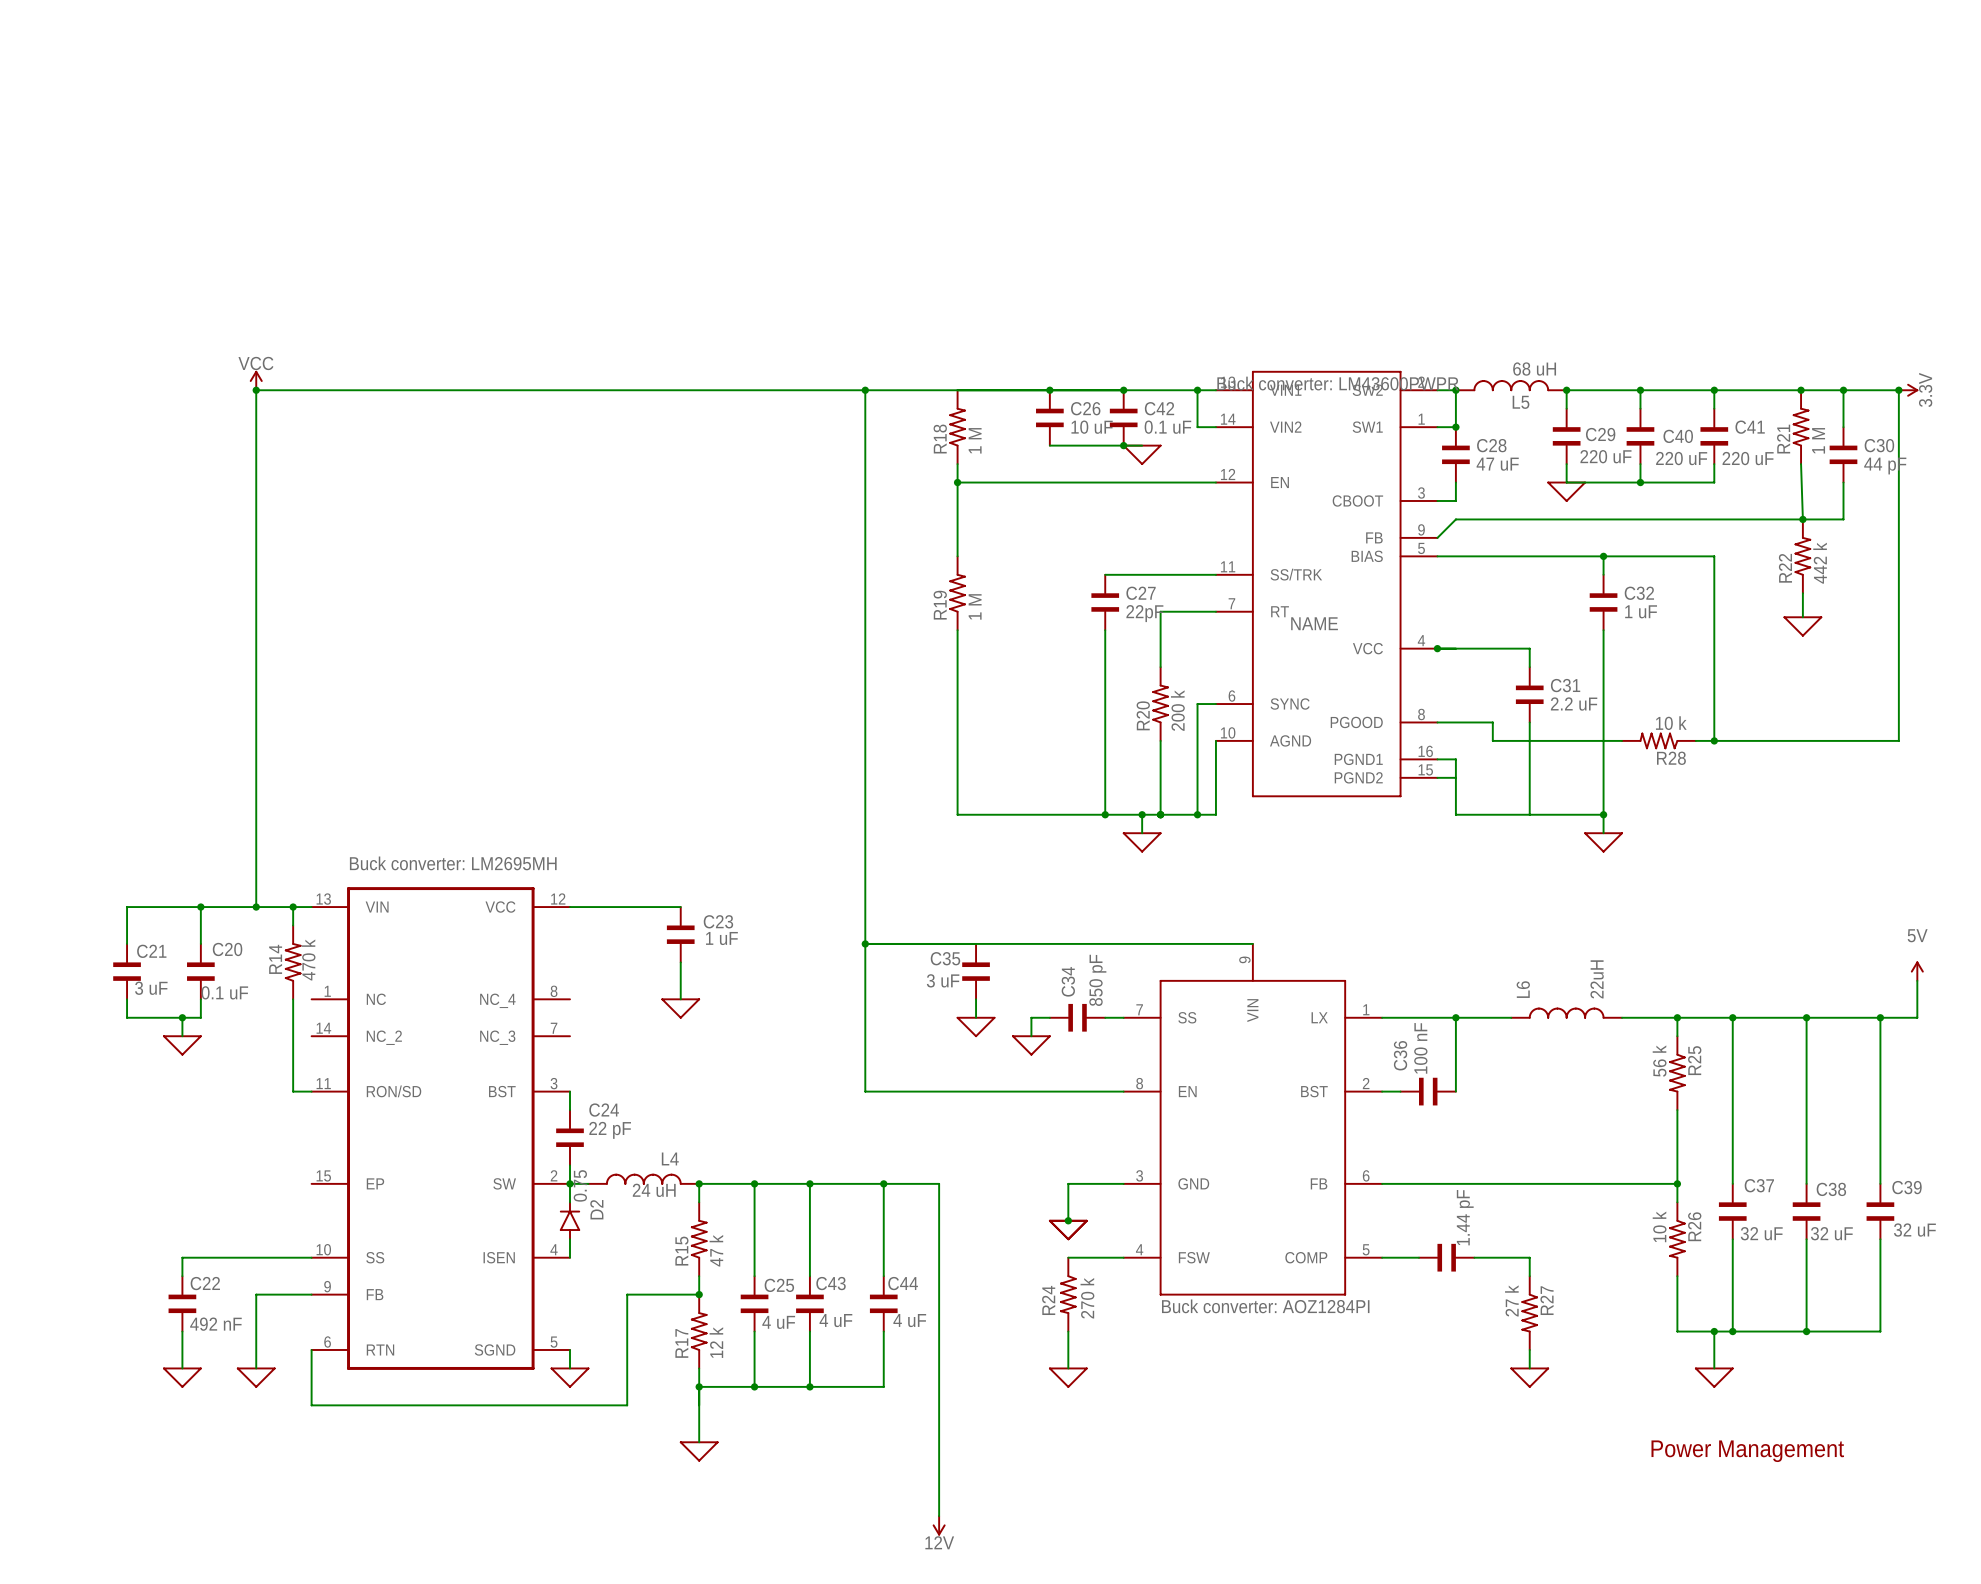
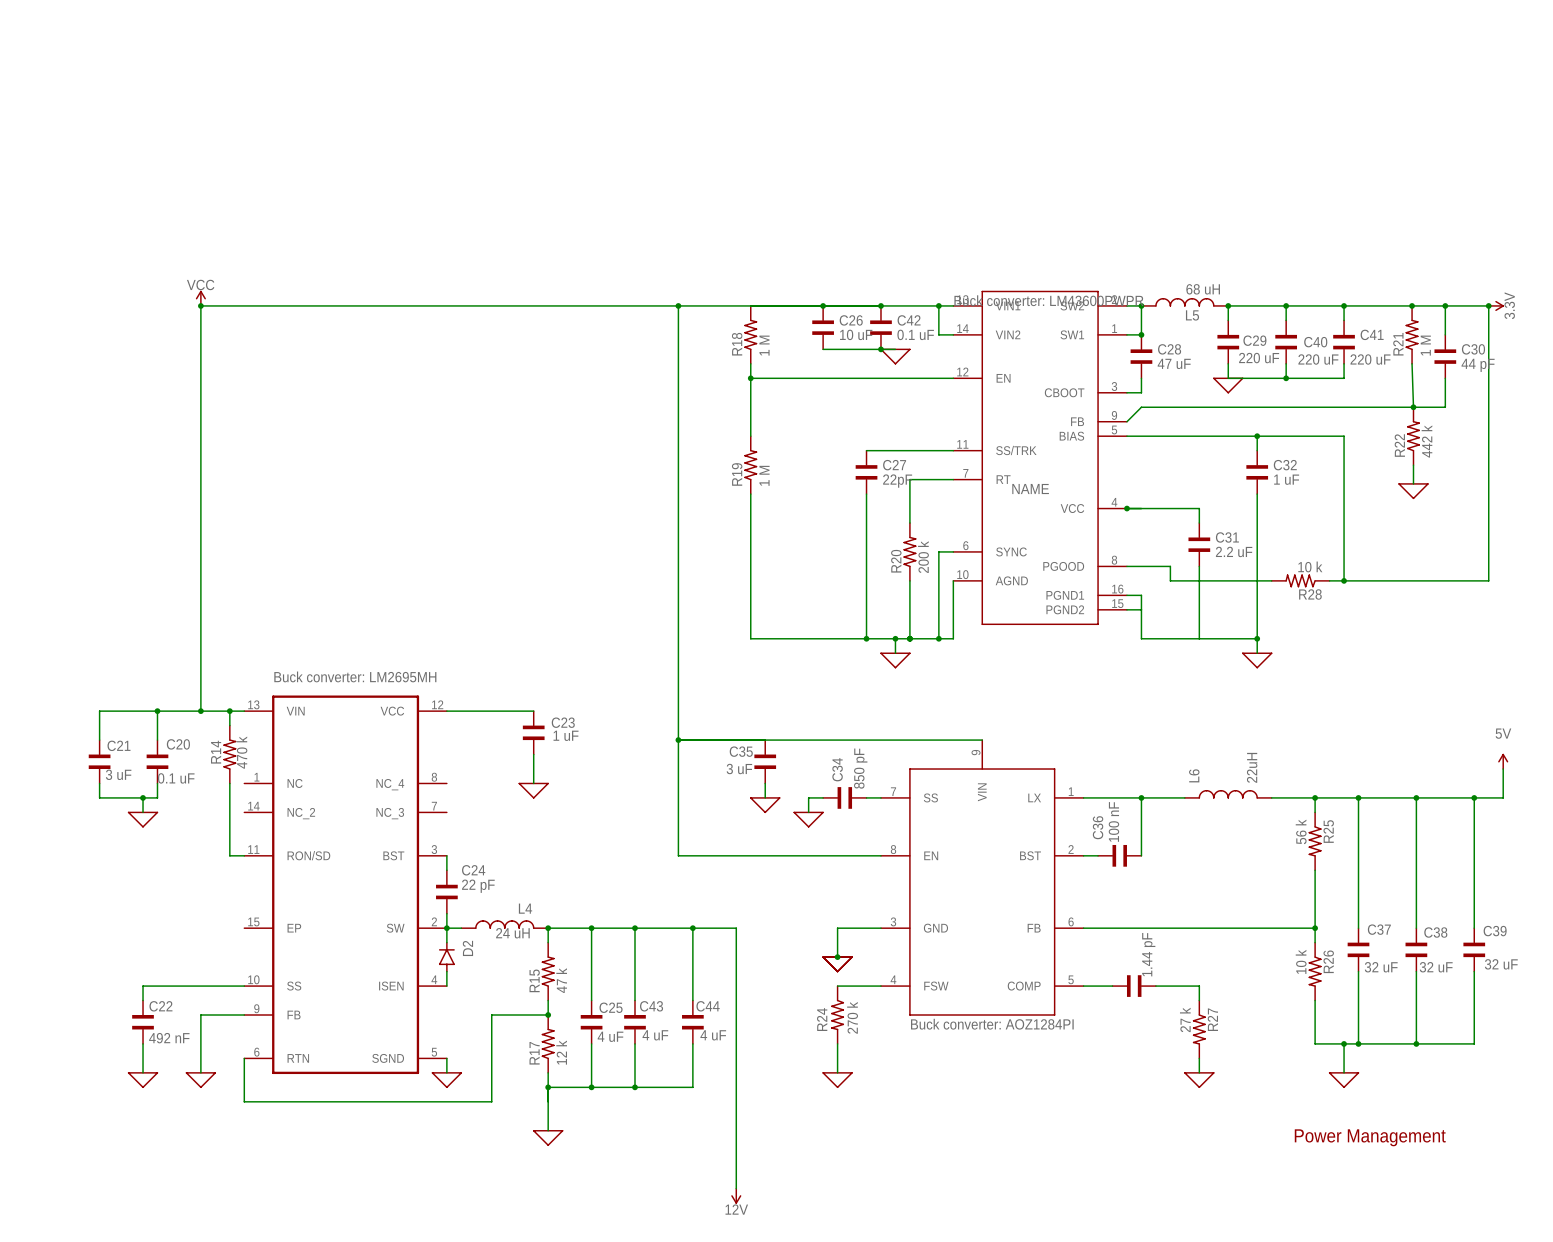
D2 value: 0.75 (580, 1185) -> none

